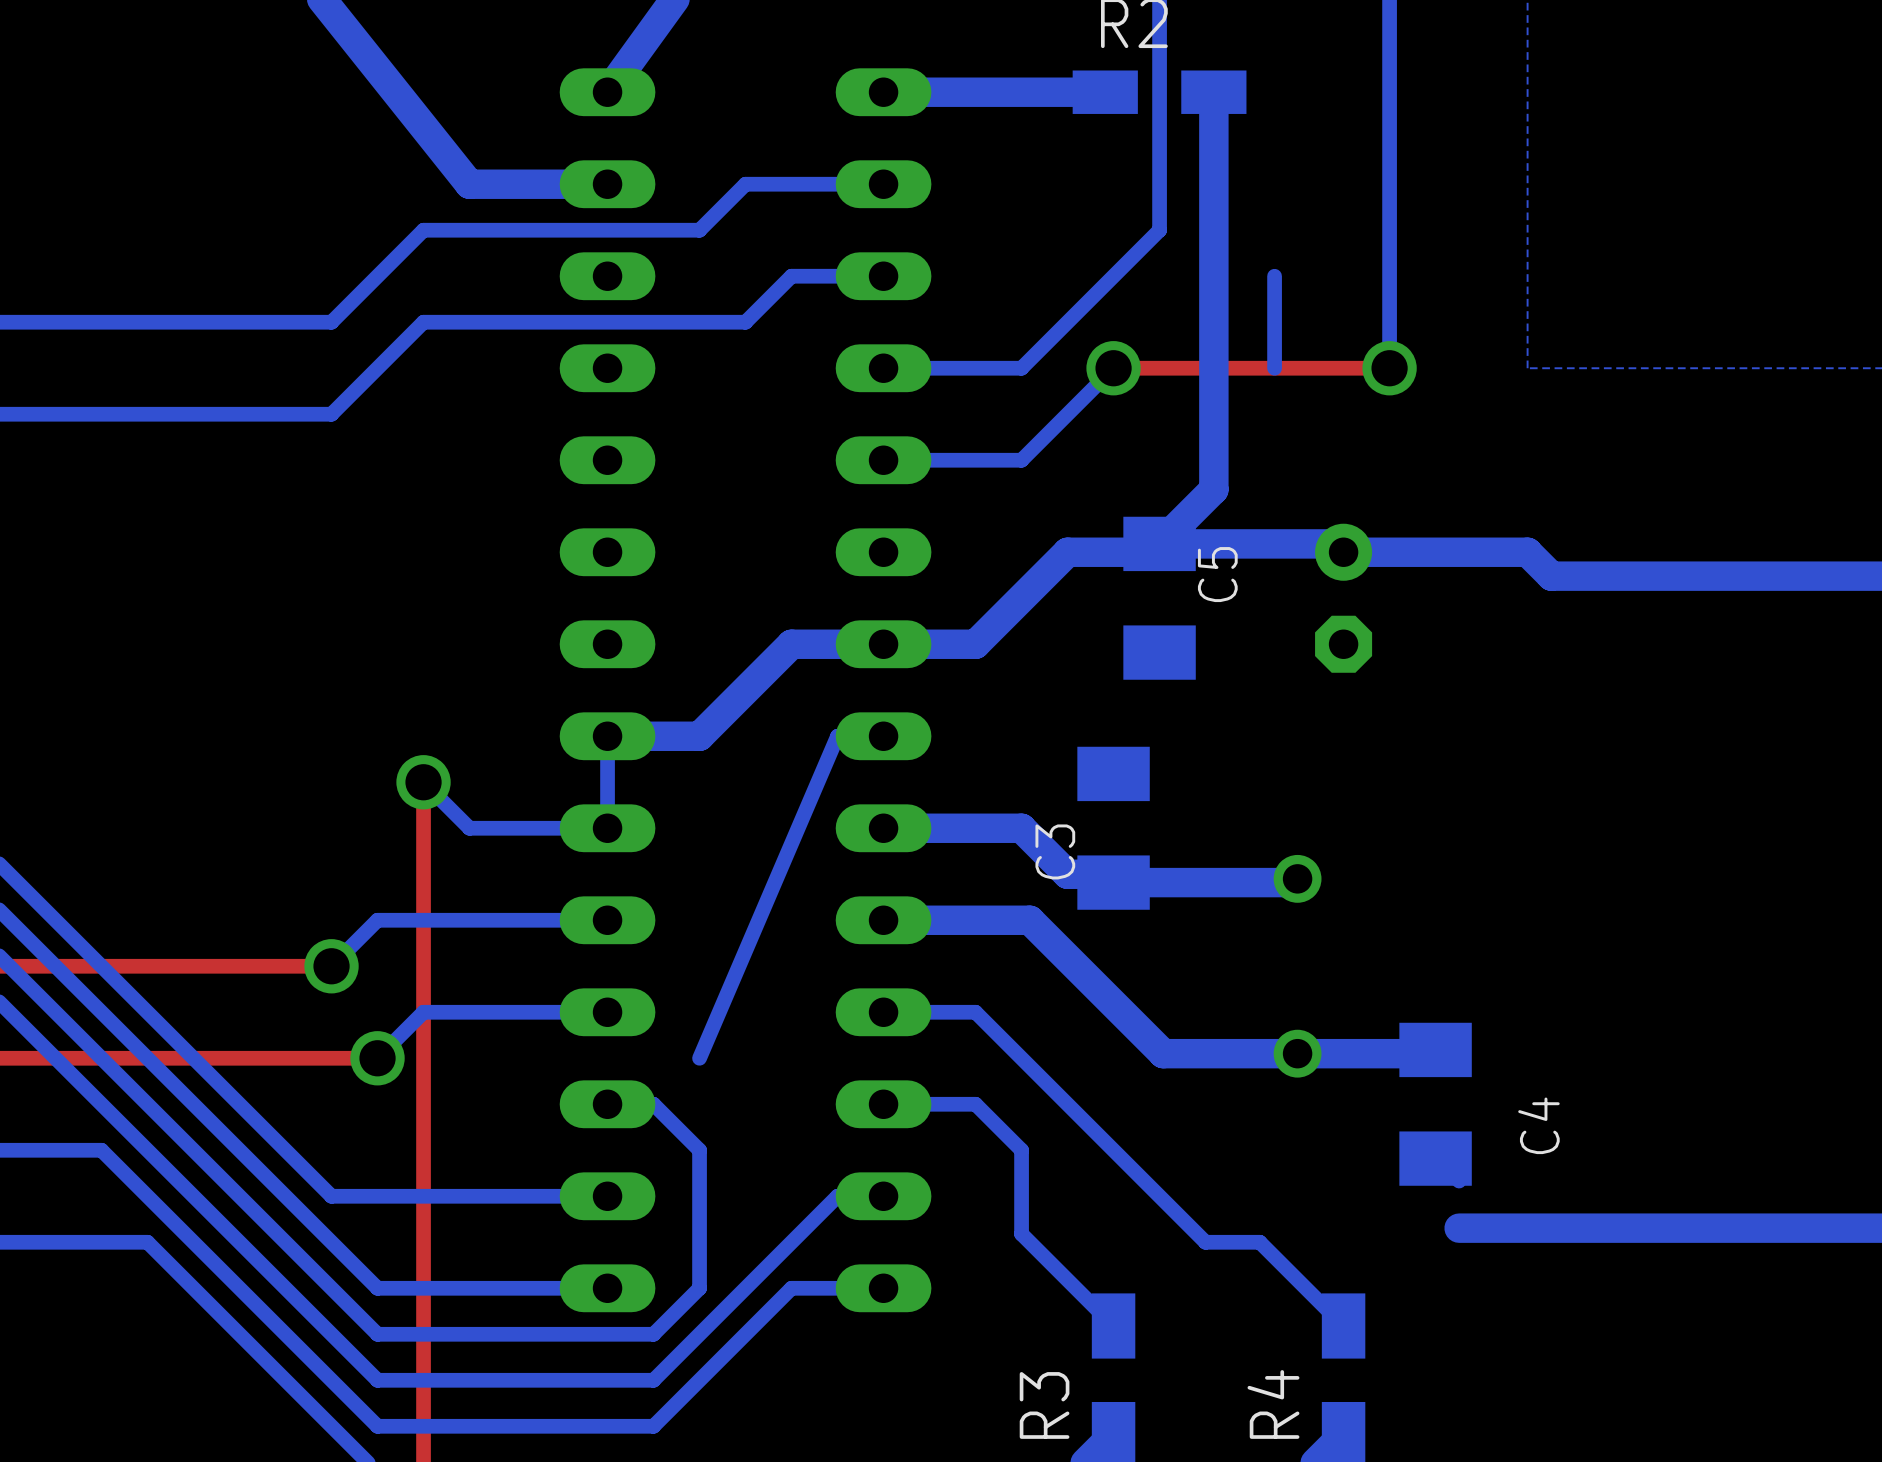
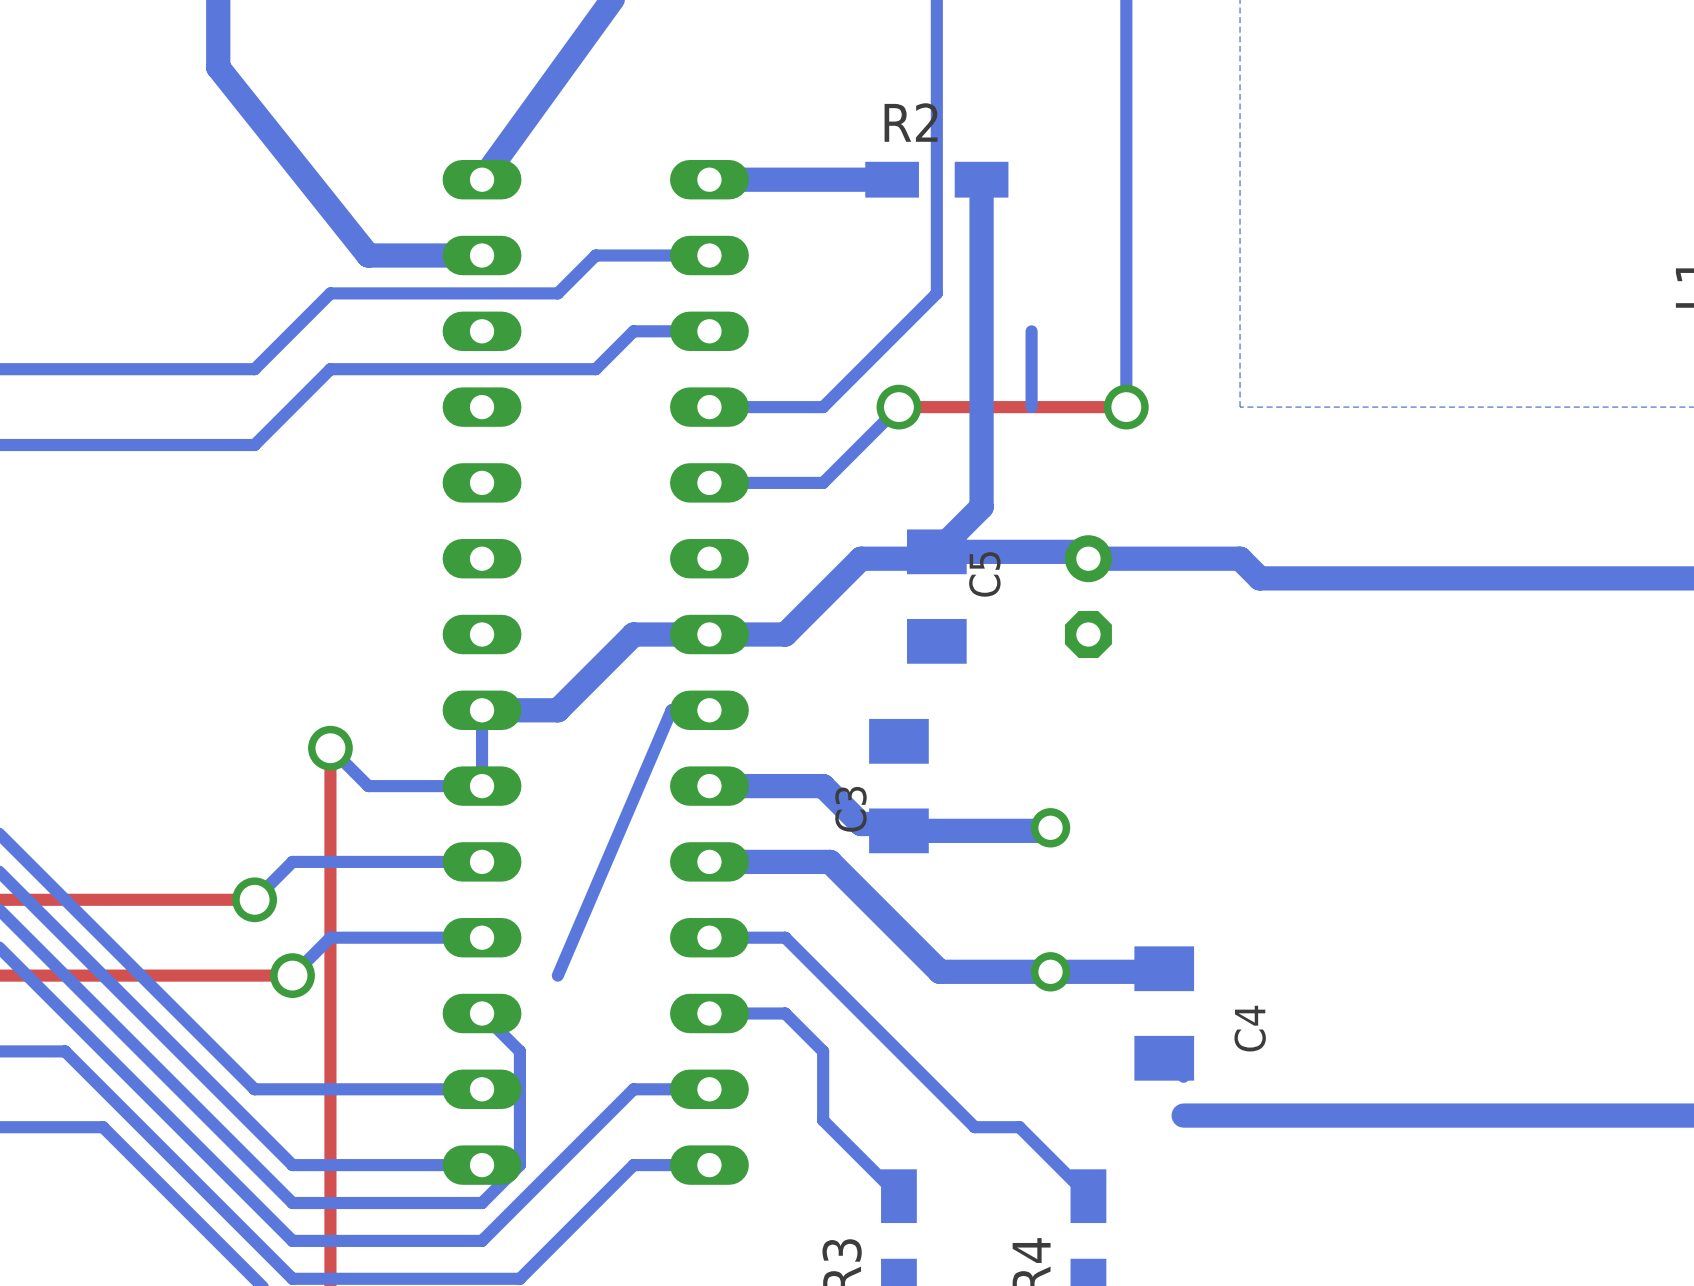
bottom track: (607, 1104) (653, 1104) (699, 1150) (699, 1288) -> (482, 1013) (519, 1051) (519, 1165) (482, 1203)
bottom track: (837, 1196) (653, 1380) (607, 1380) -> (671, 1089) (633, 1089) (557, 1165)
bottom track: (653, 1334) (607, 1334) -> (519, 1203) (482, 1240)

